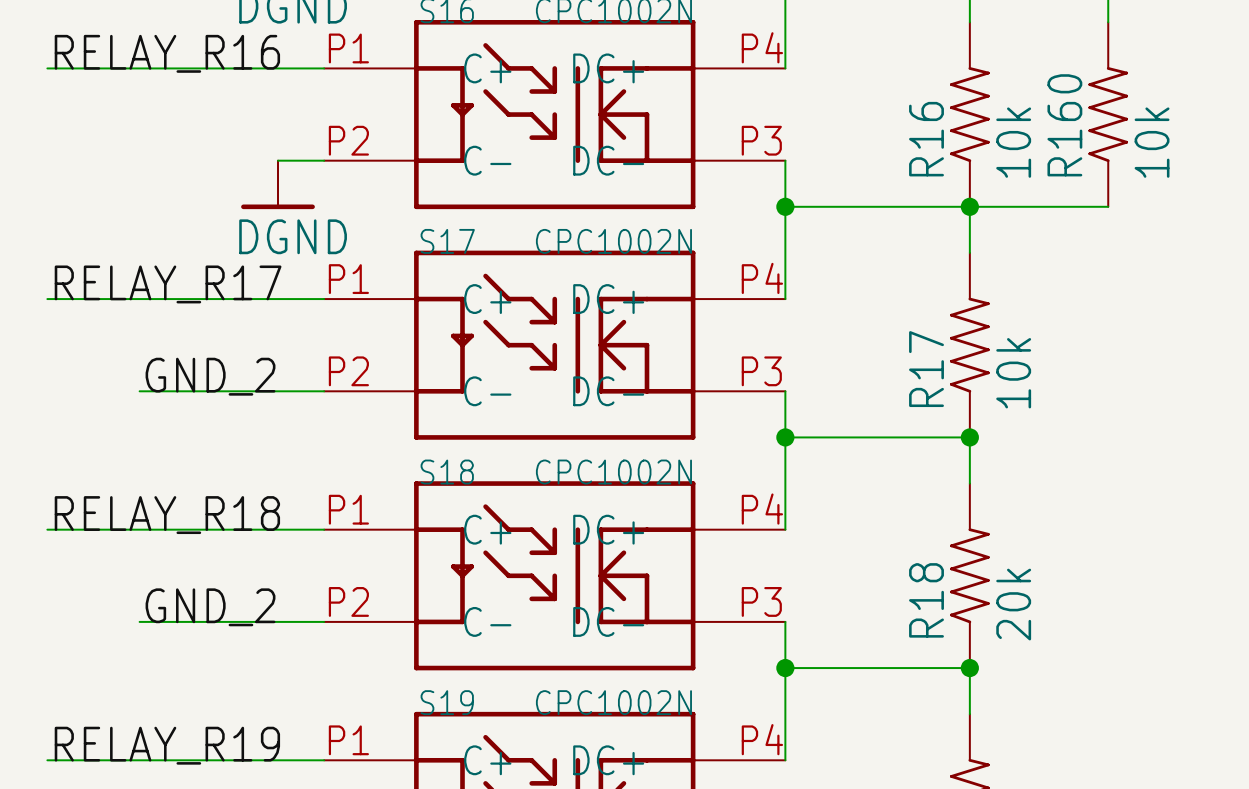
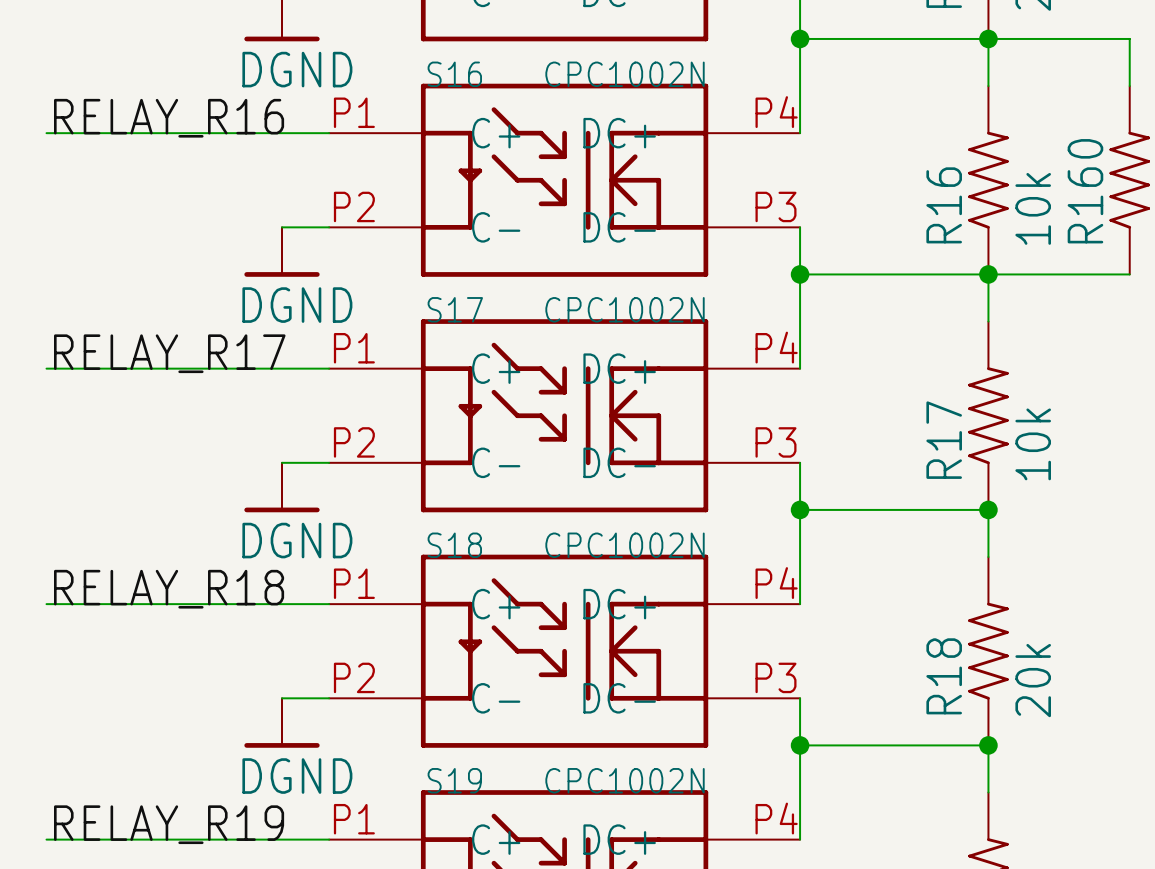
label: GND_2 (210, 376) -> none
wire: (139, 391) (278, 391) -> none
power symbol: none -> DGND (282, 487)
label: GND_2 (210, 607) -> none
wire: (139, 621) (278, 621) -> none
power symbol: none -> DGND (282, 723)

